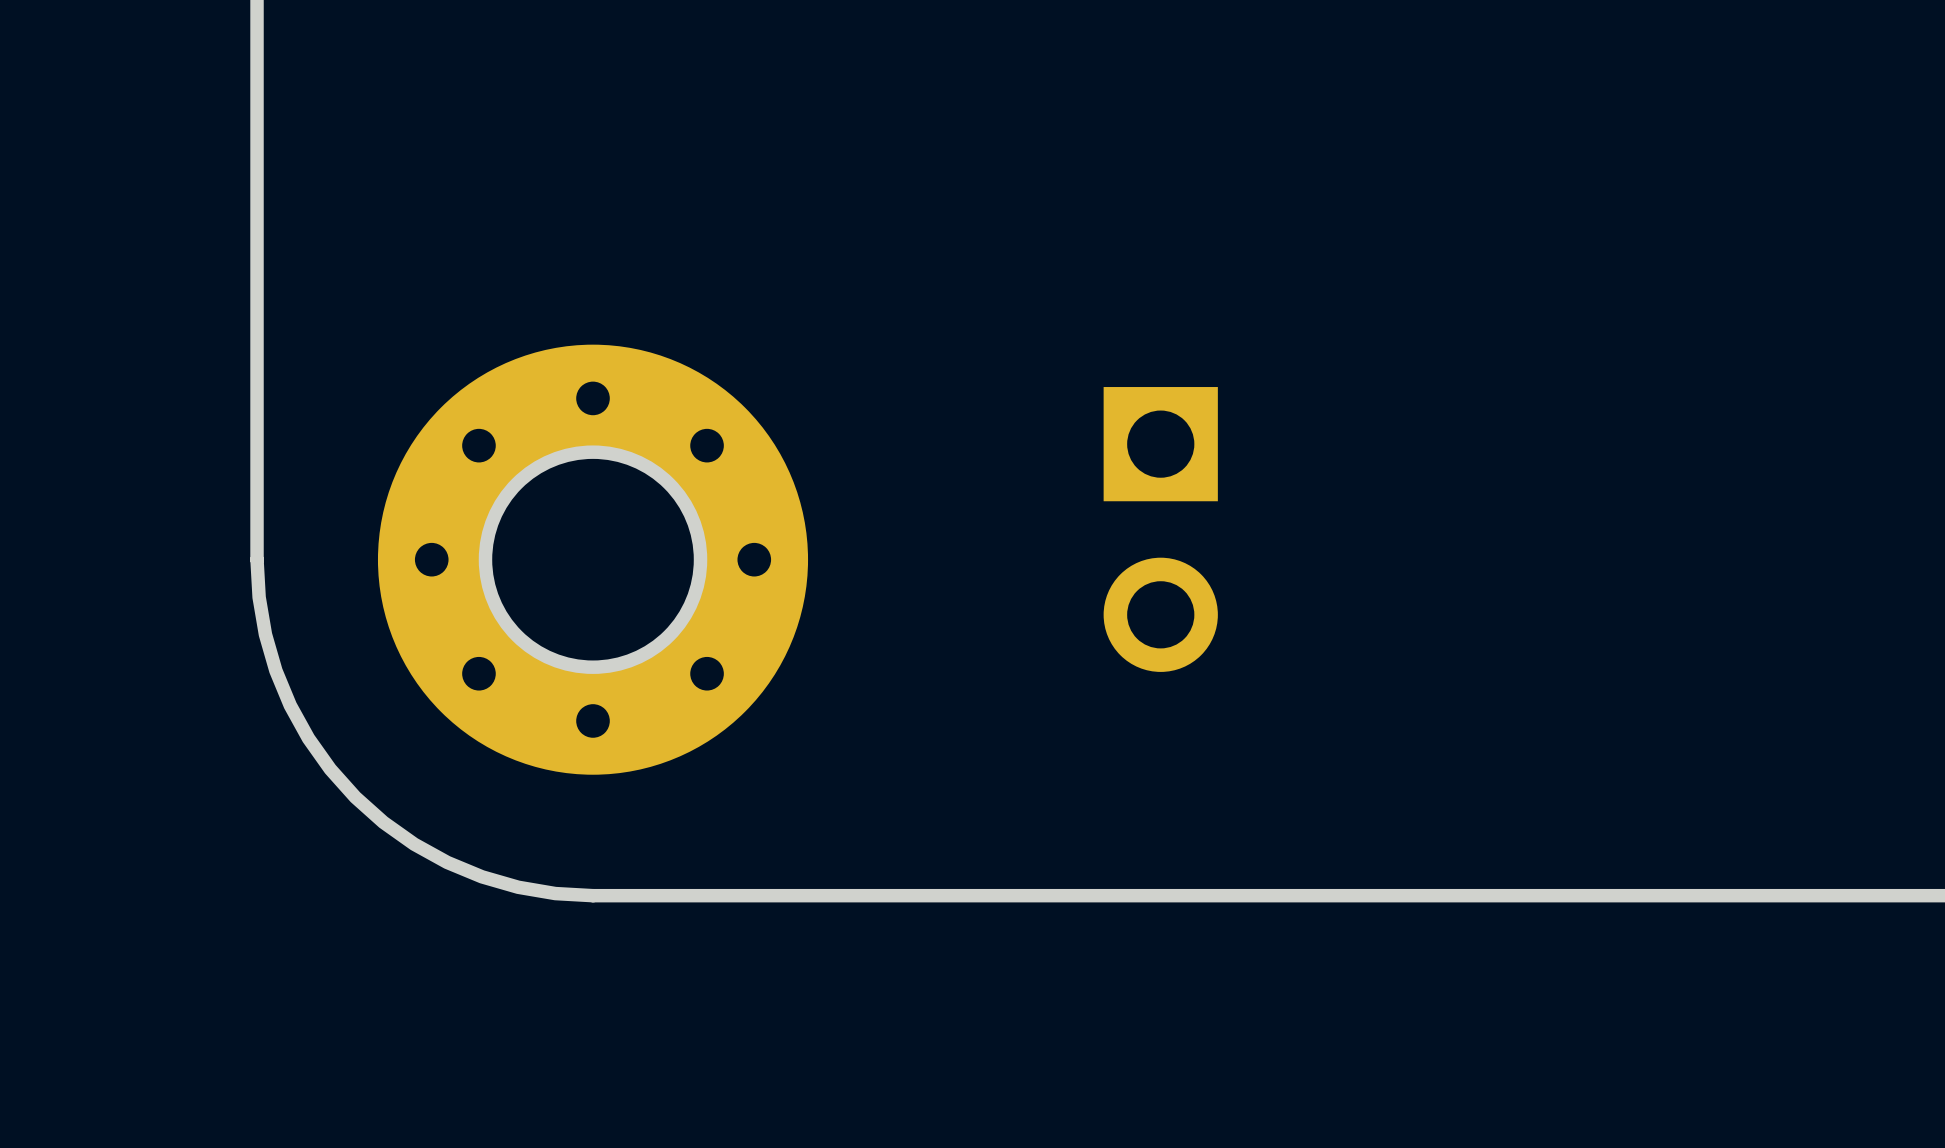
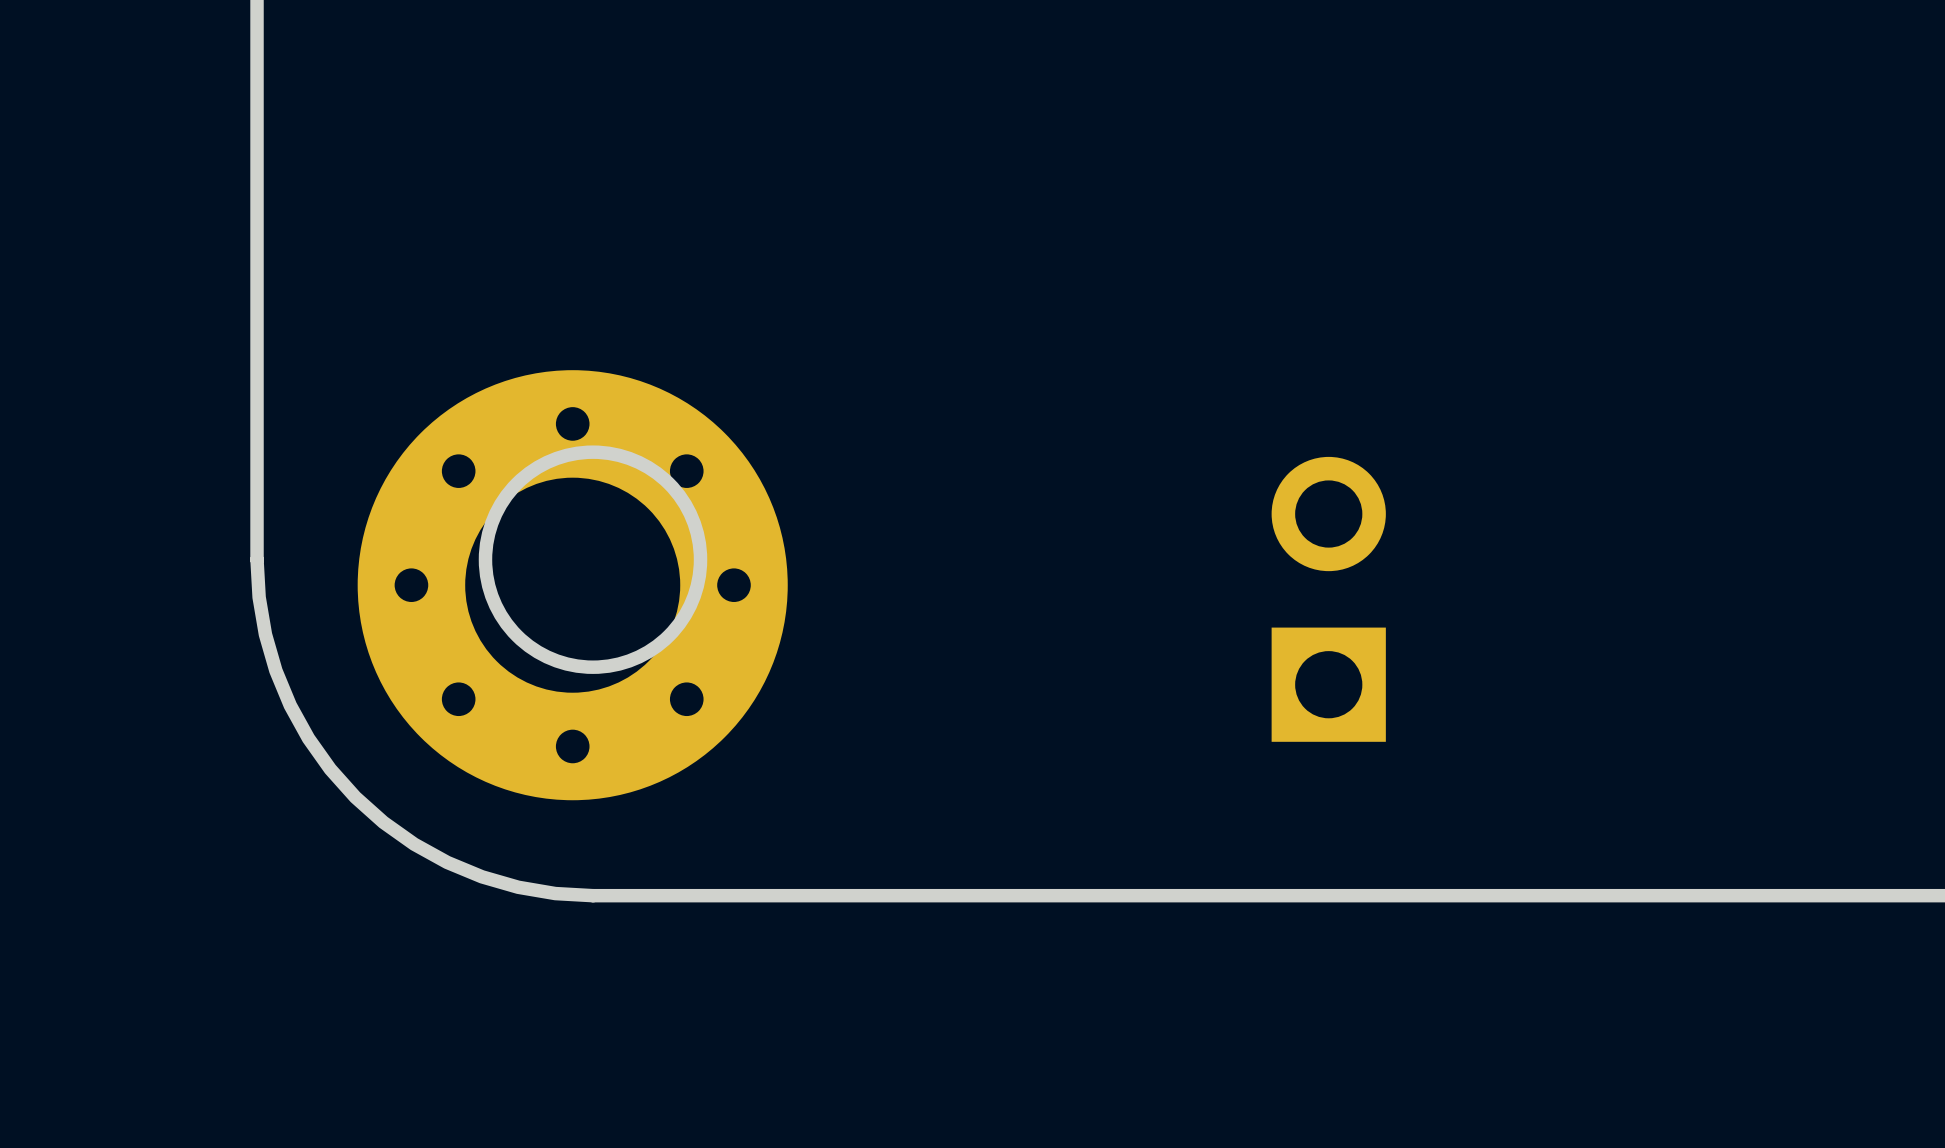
part rotation: 0° (1160, 529) -> 180° (1328, 599)
part position: (1160, 529) -> (1328, 599)
part position: (593, 559) -> (572, 585)

